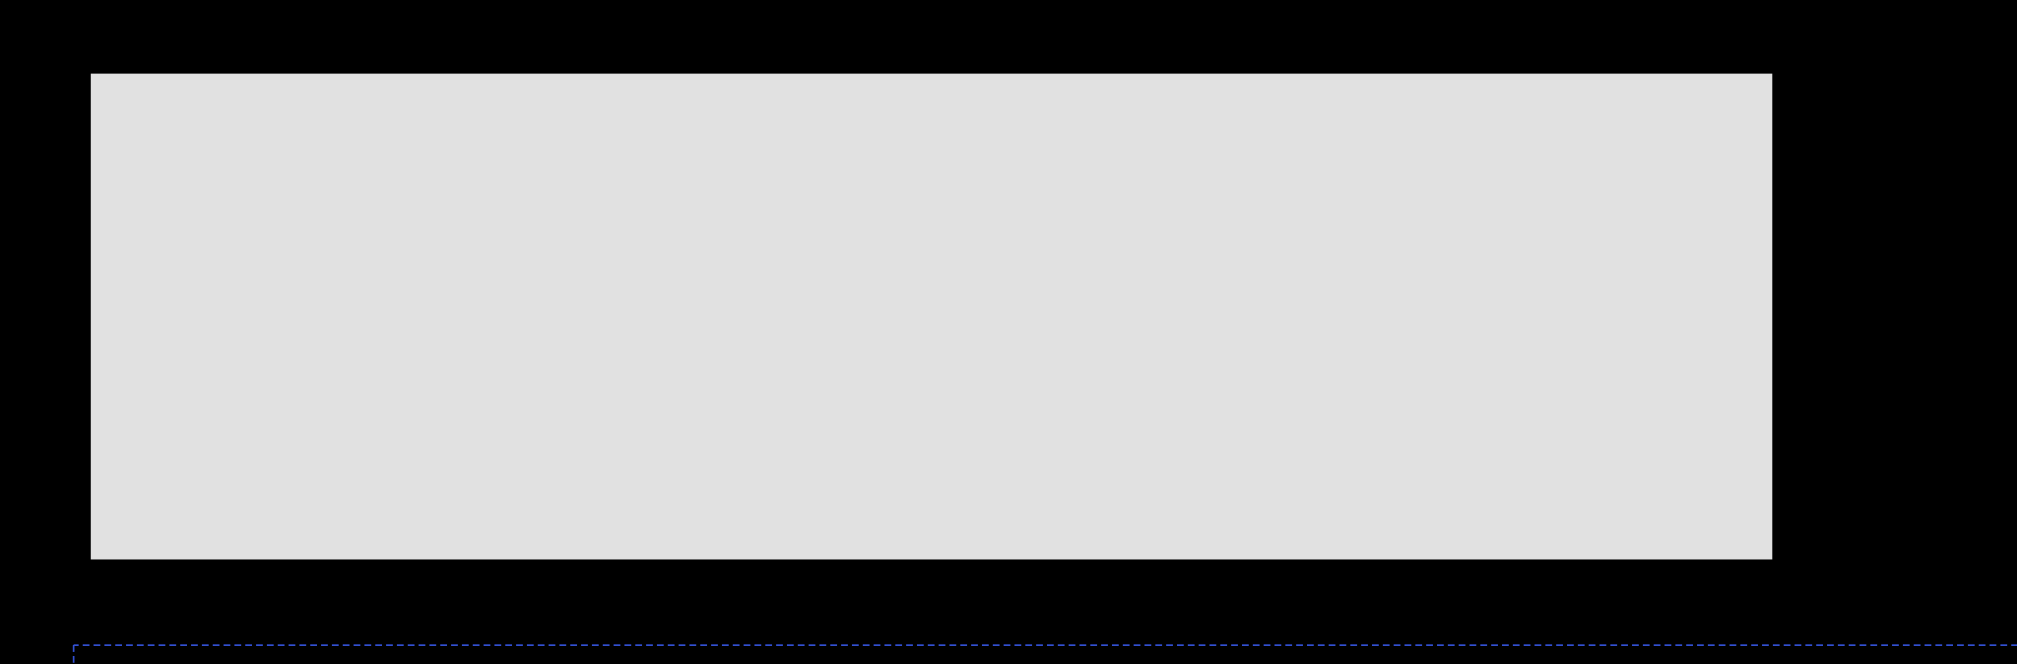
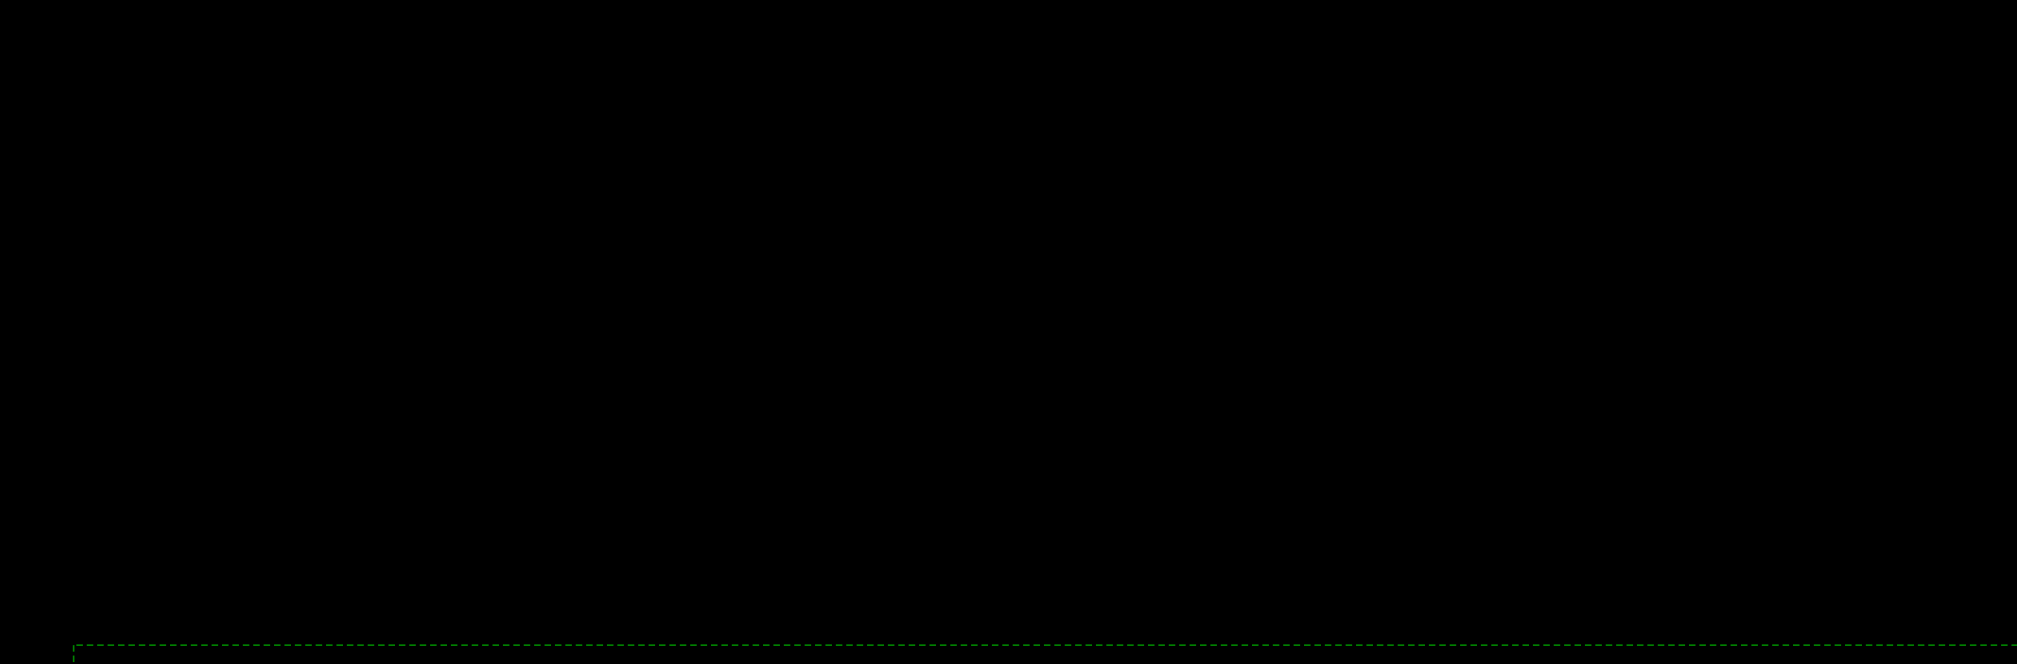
drawing: [90, 73, 1773, 560] -> none

